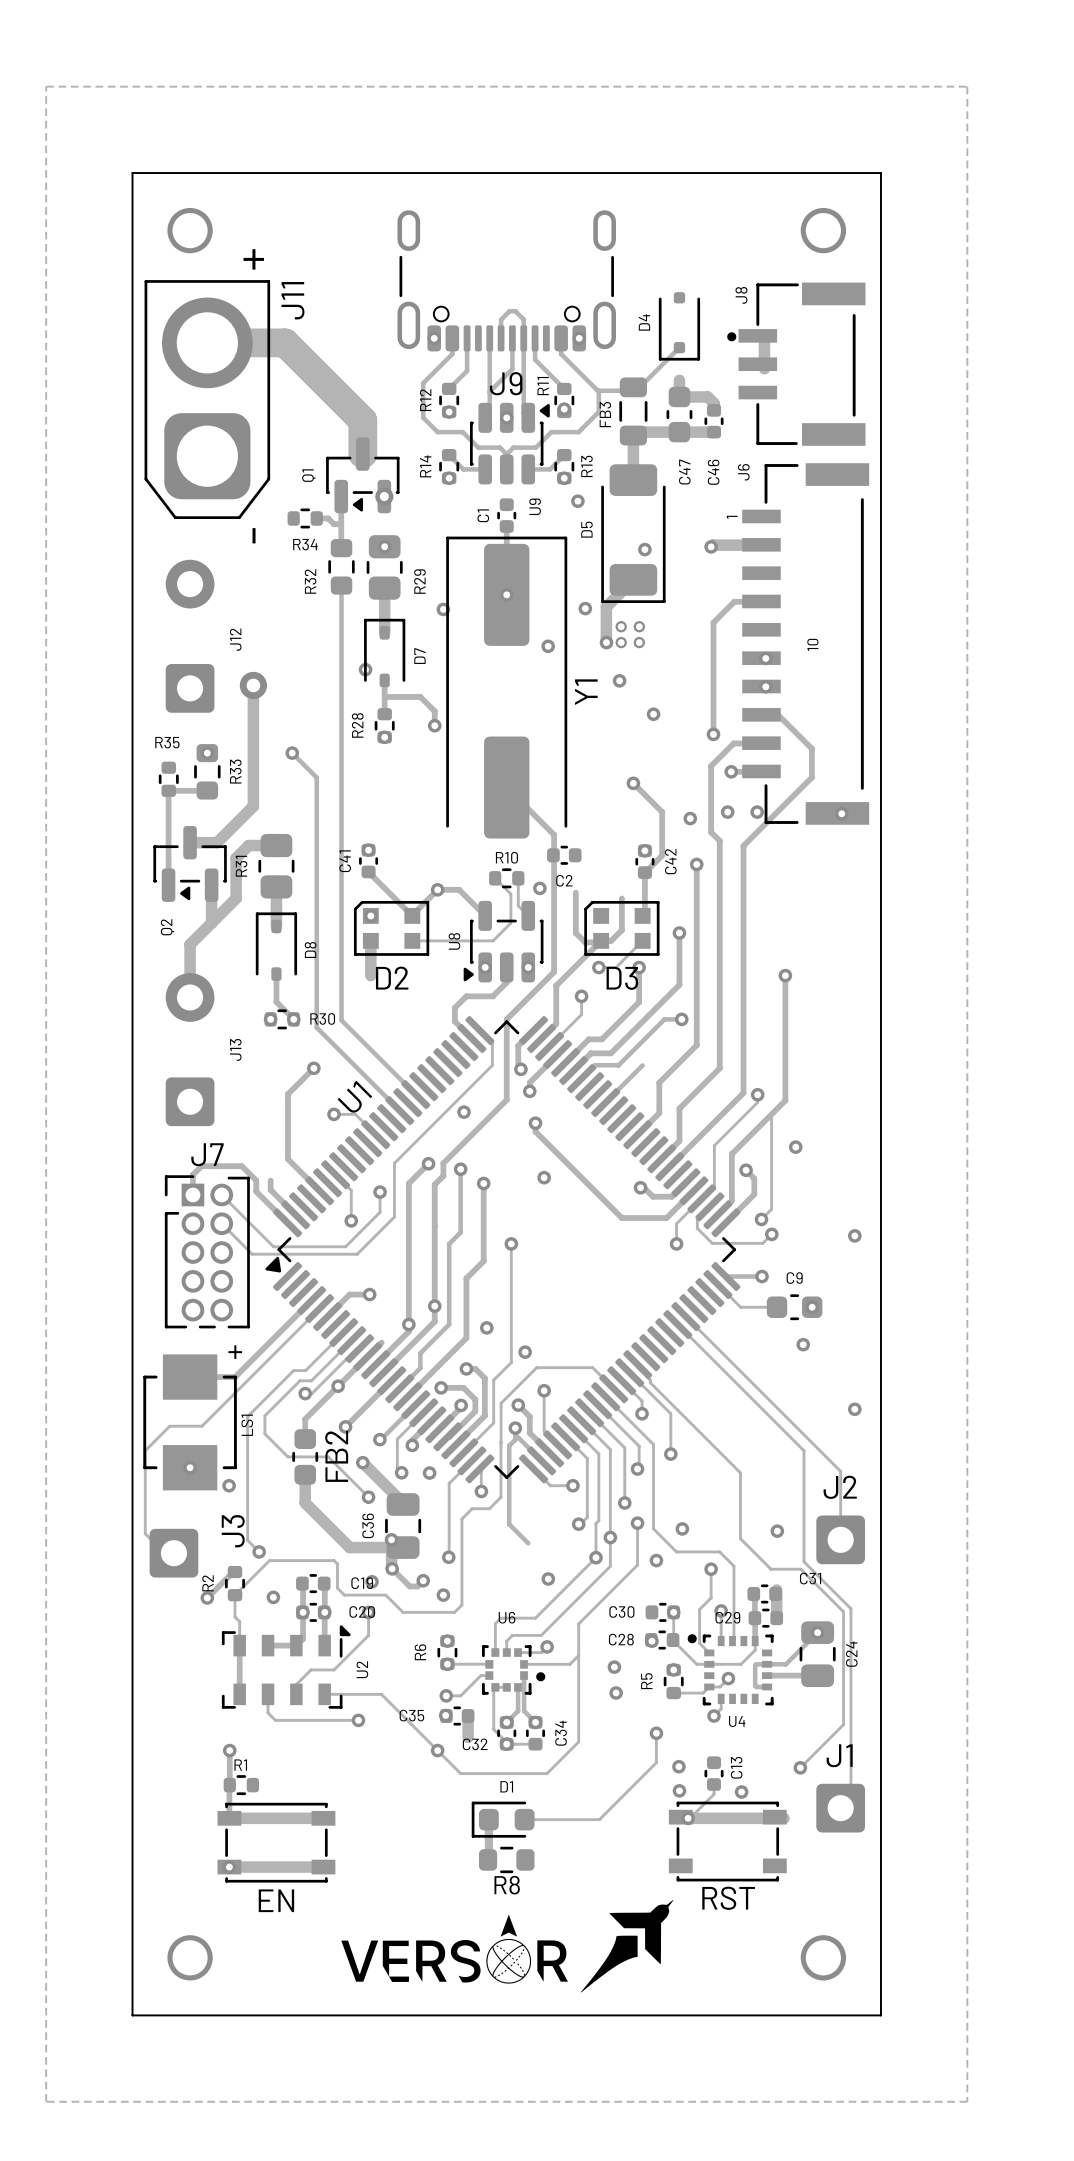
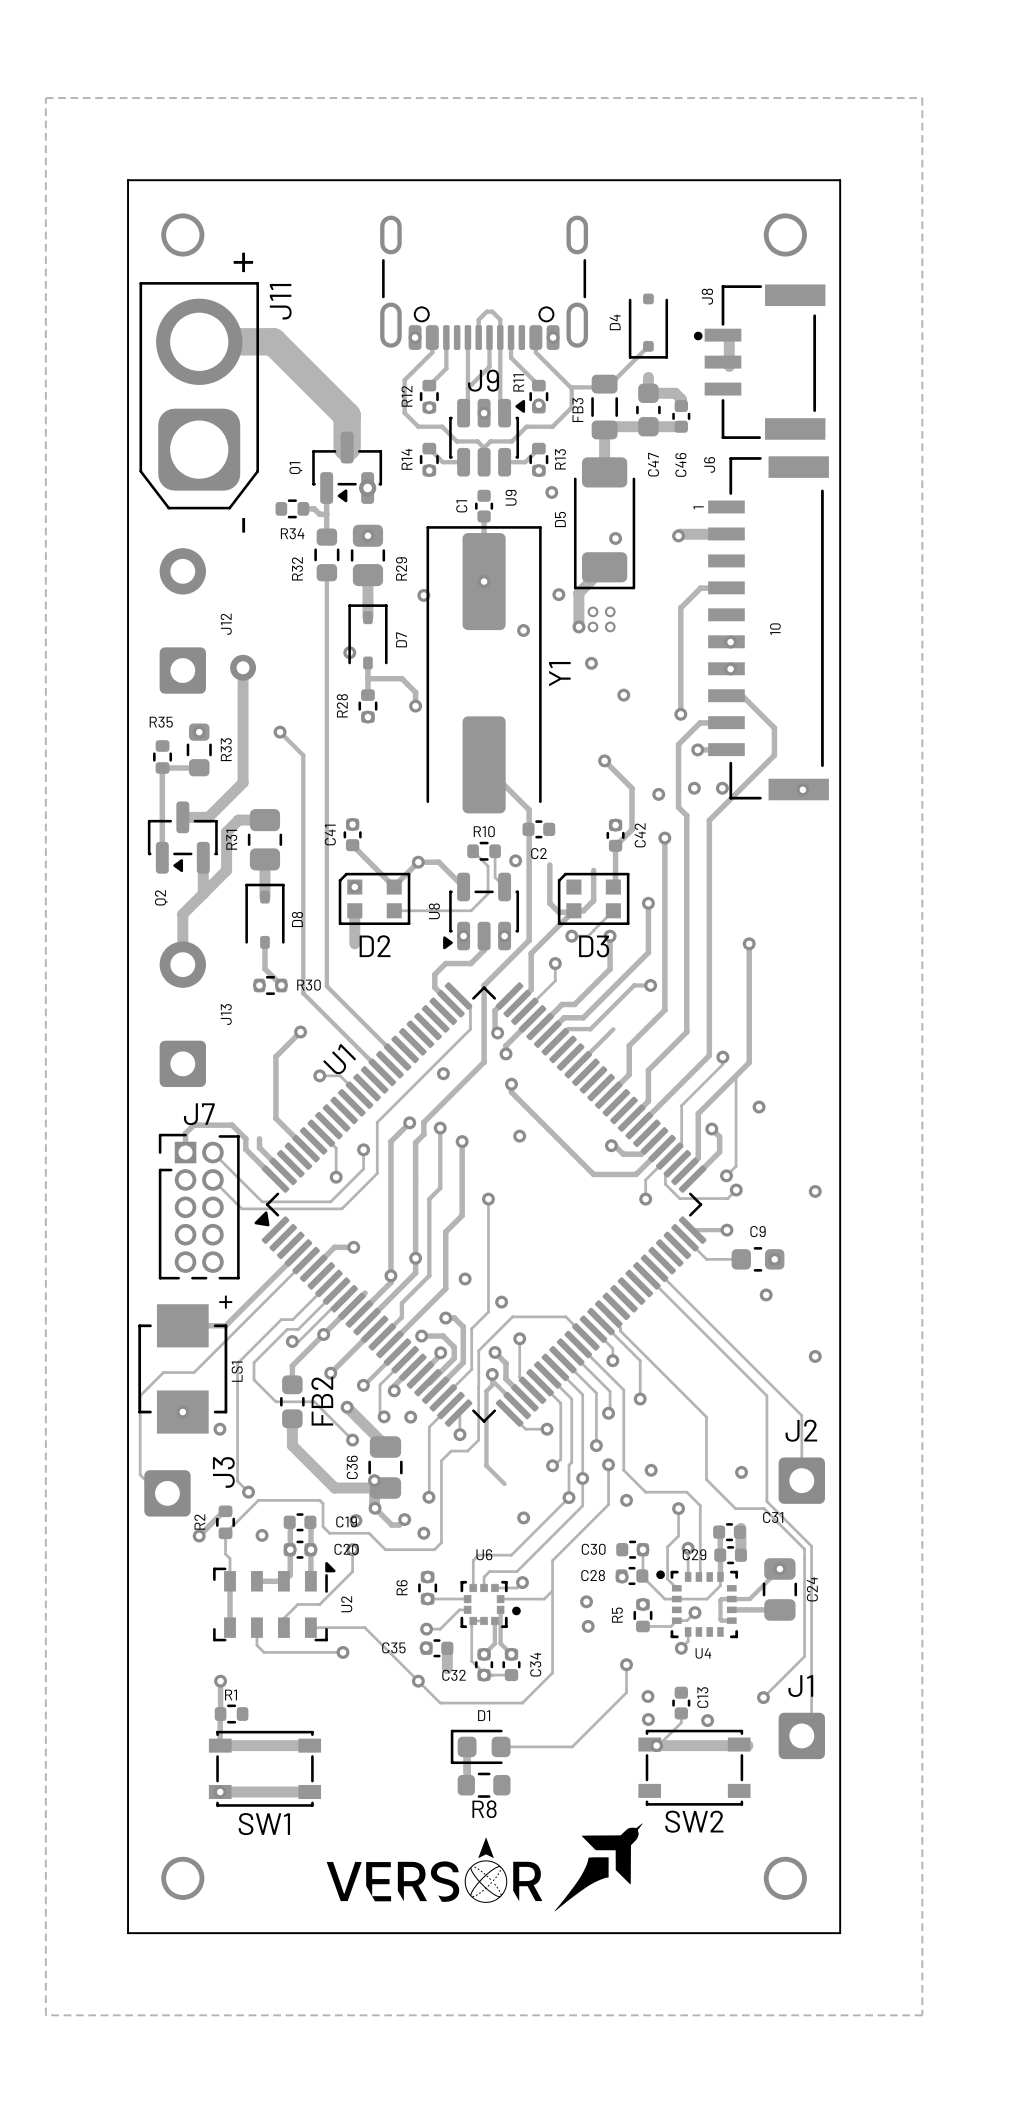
RST name: RST (728, 1898) -> SW2 (694, 1821)
EN name: EN (276, 1900) -> SW1 (264, 1824)

